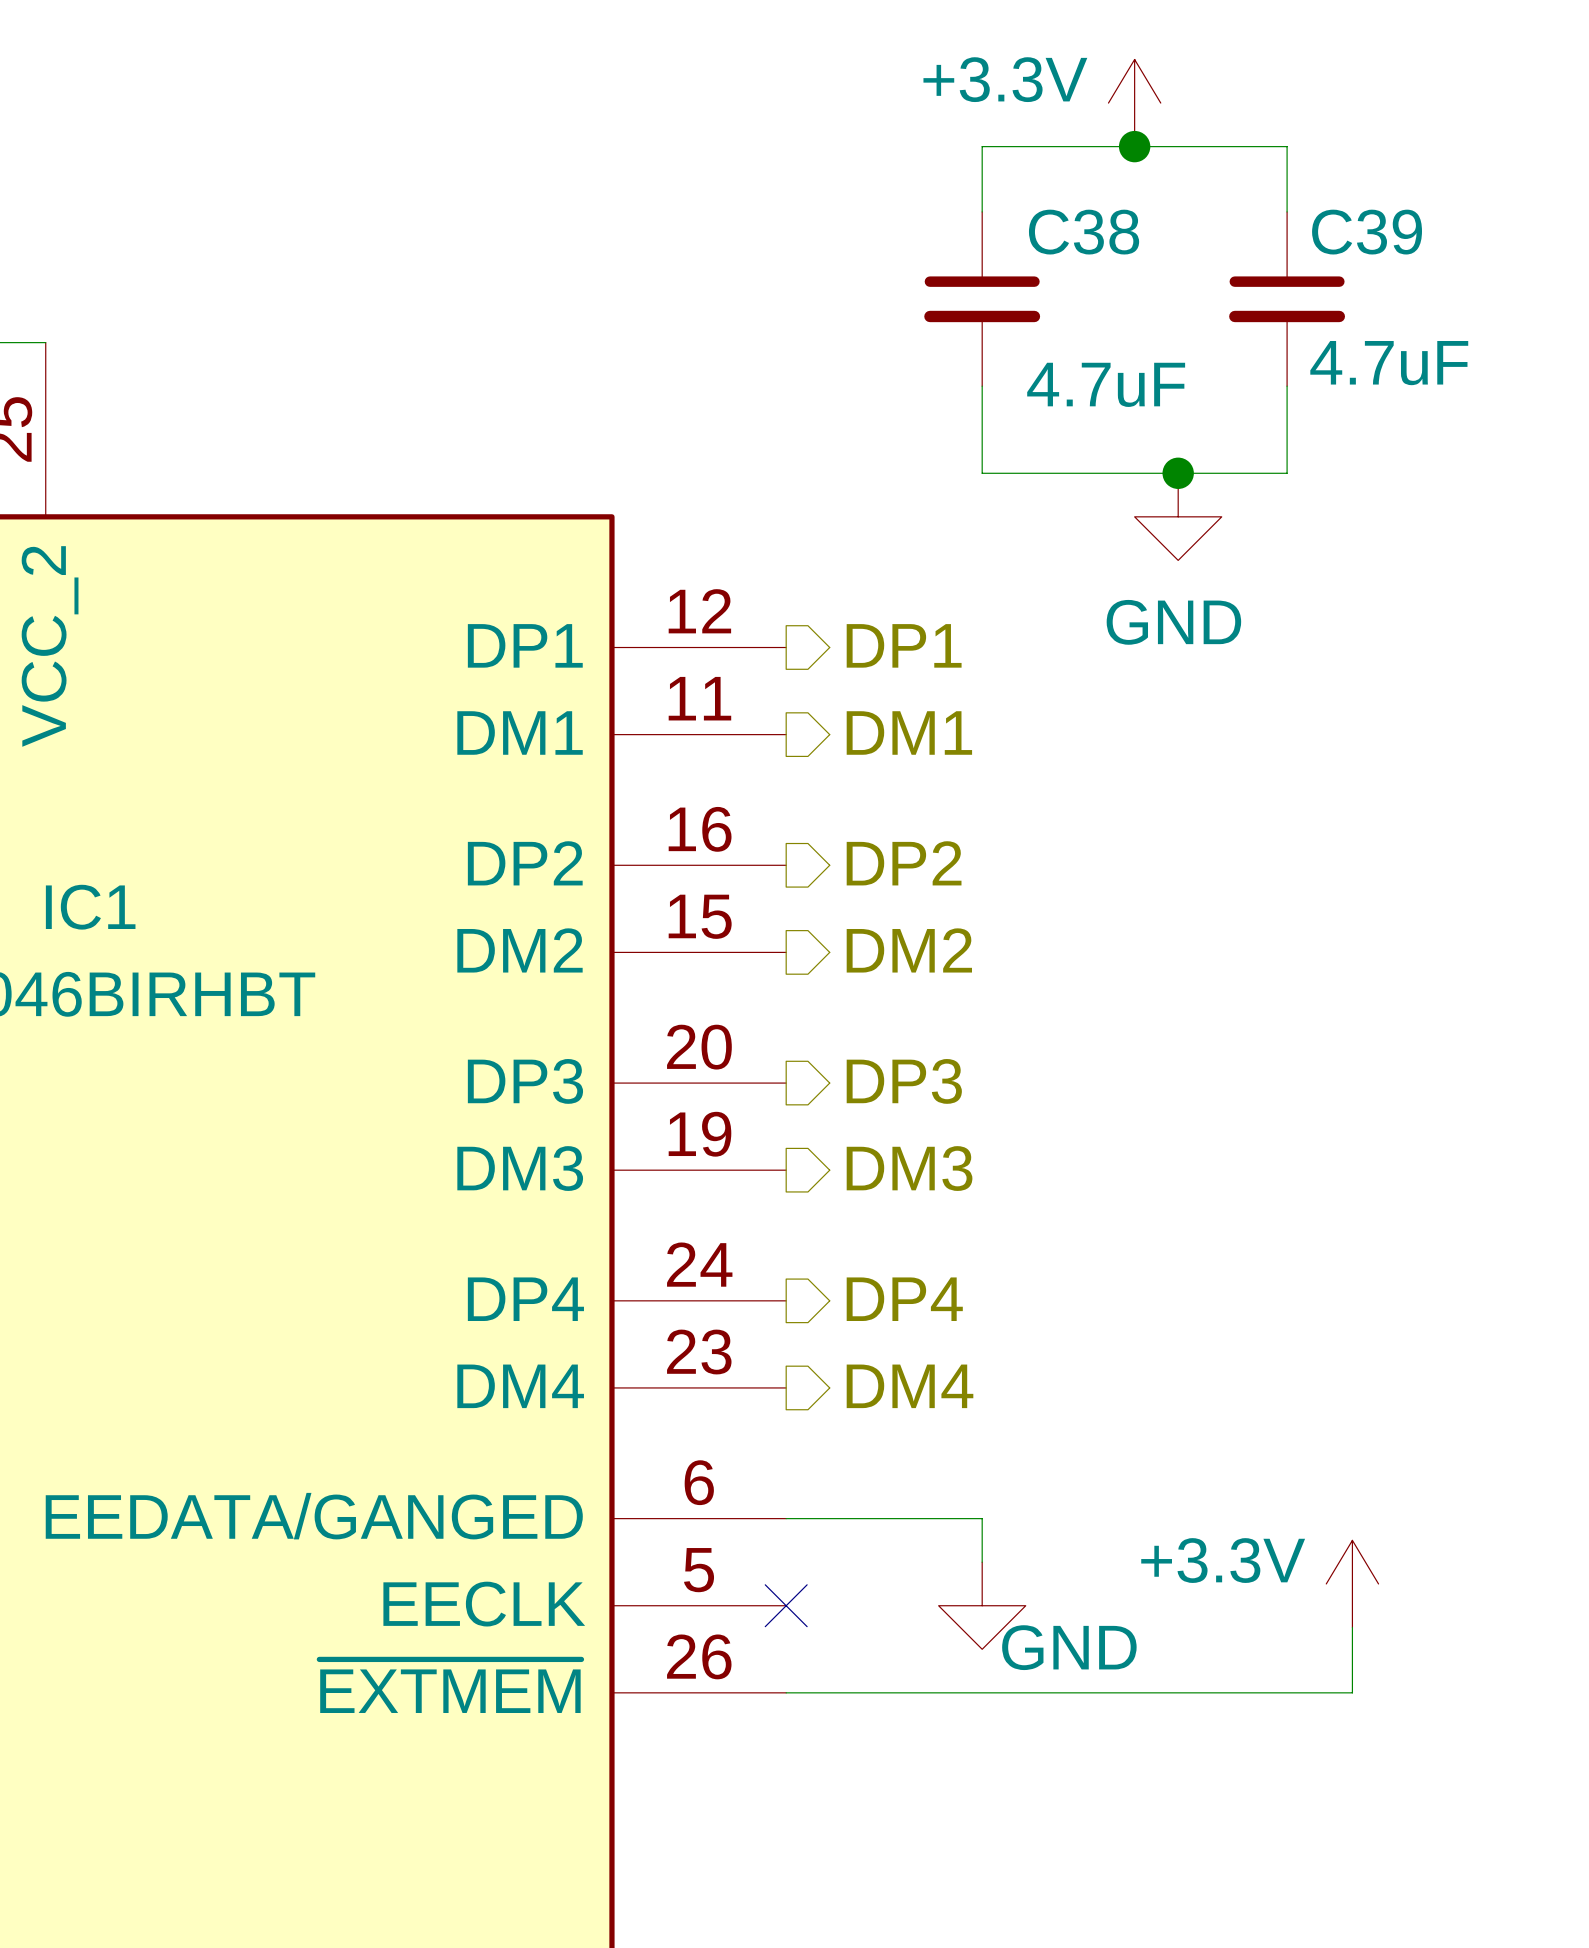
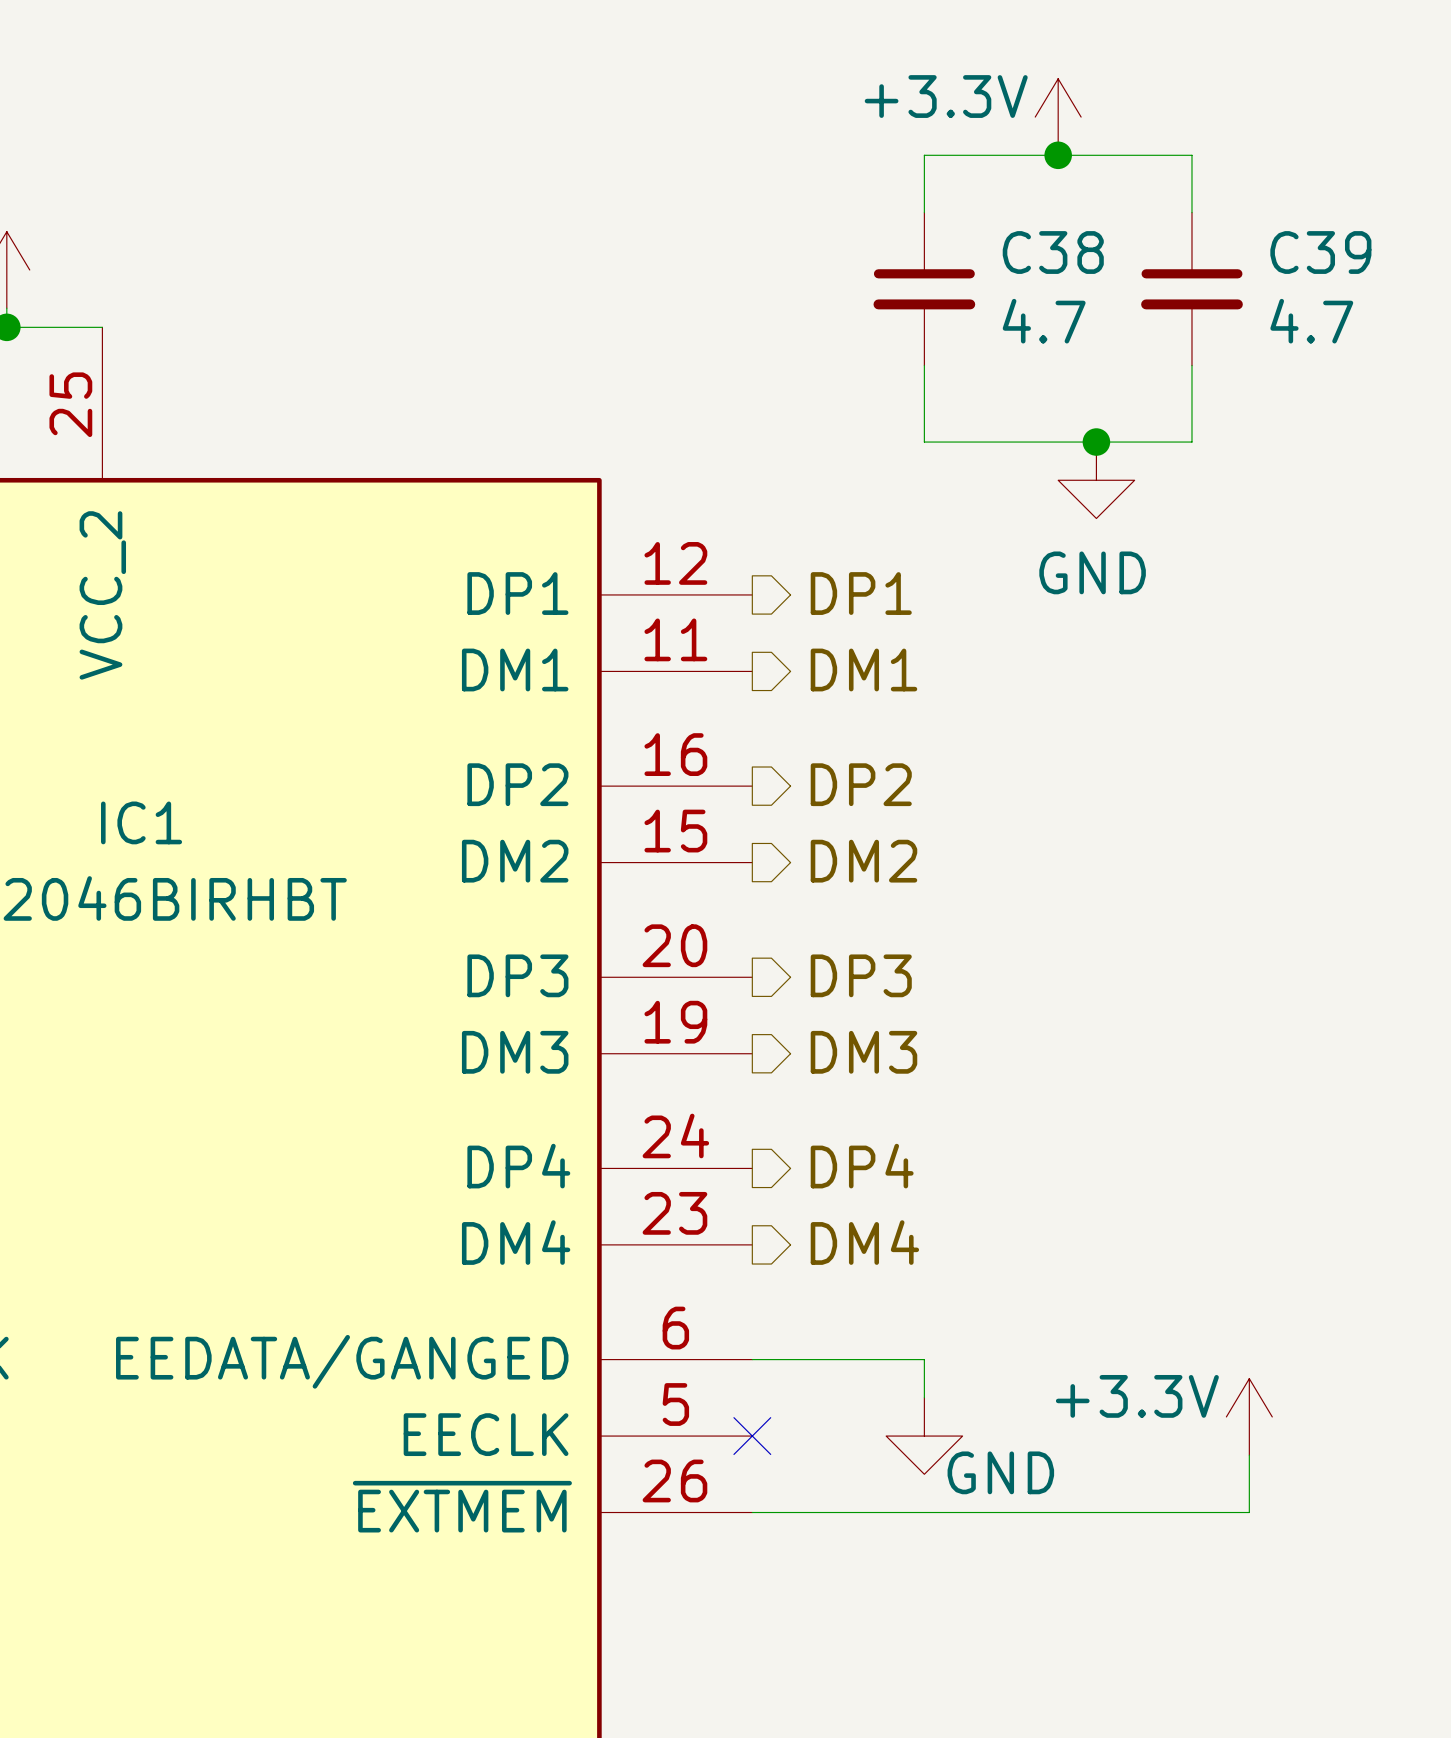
C38 name position: C38 (1084, 232) -> C38 (1053, 252)
C39 name position: C39 (1367, 232) -> C39 (1320, 252)
C39 value: 4.7uF (1389, 363) -> 4.7 (1311, 321)
C38 value: 4.7uF (1106, 384) -> 4.7 (1044, 321)

